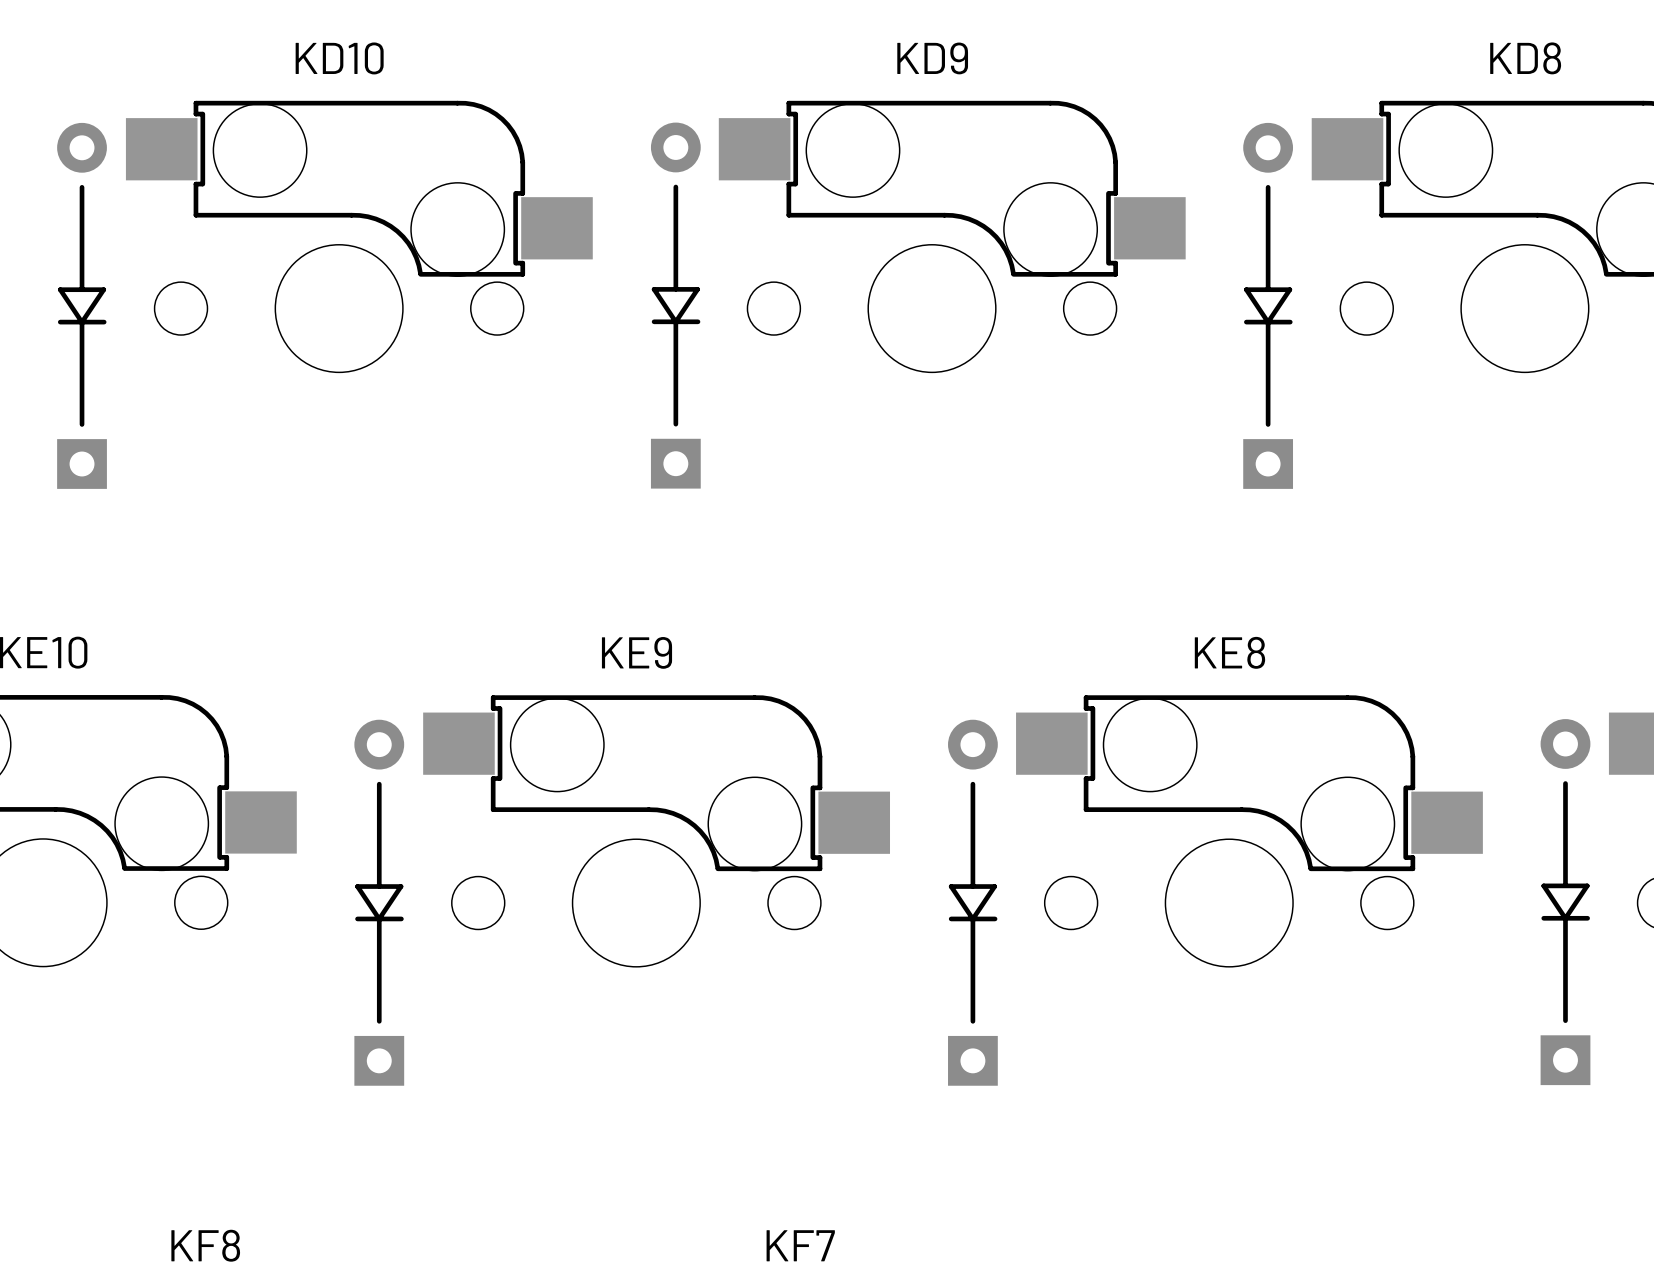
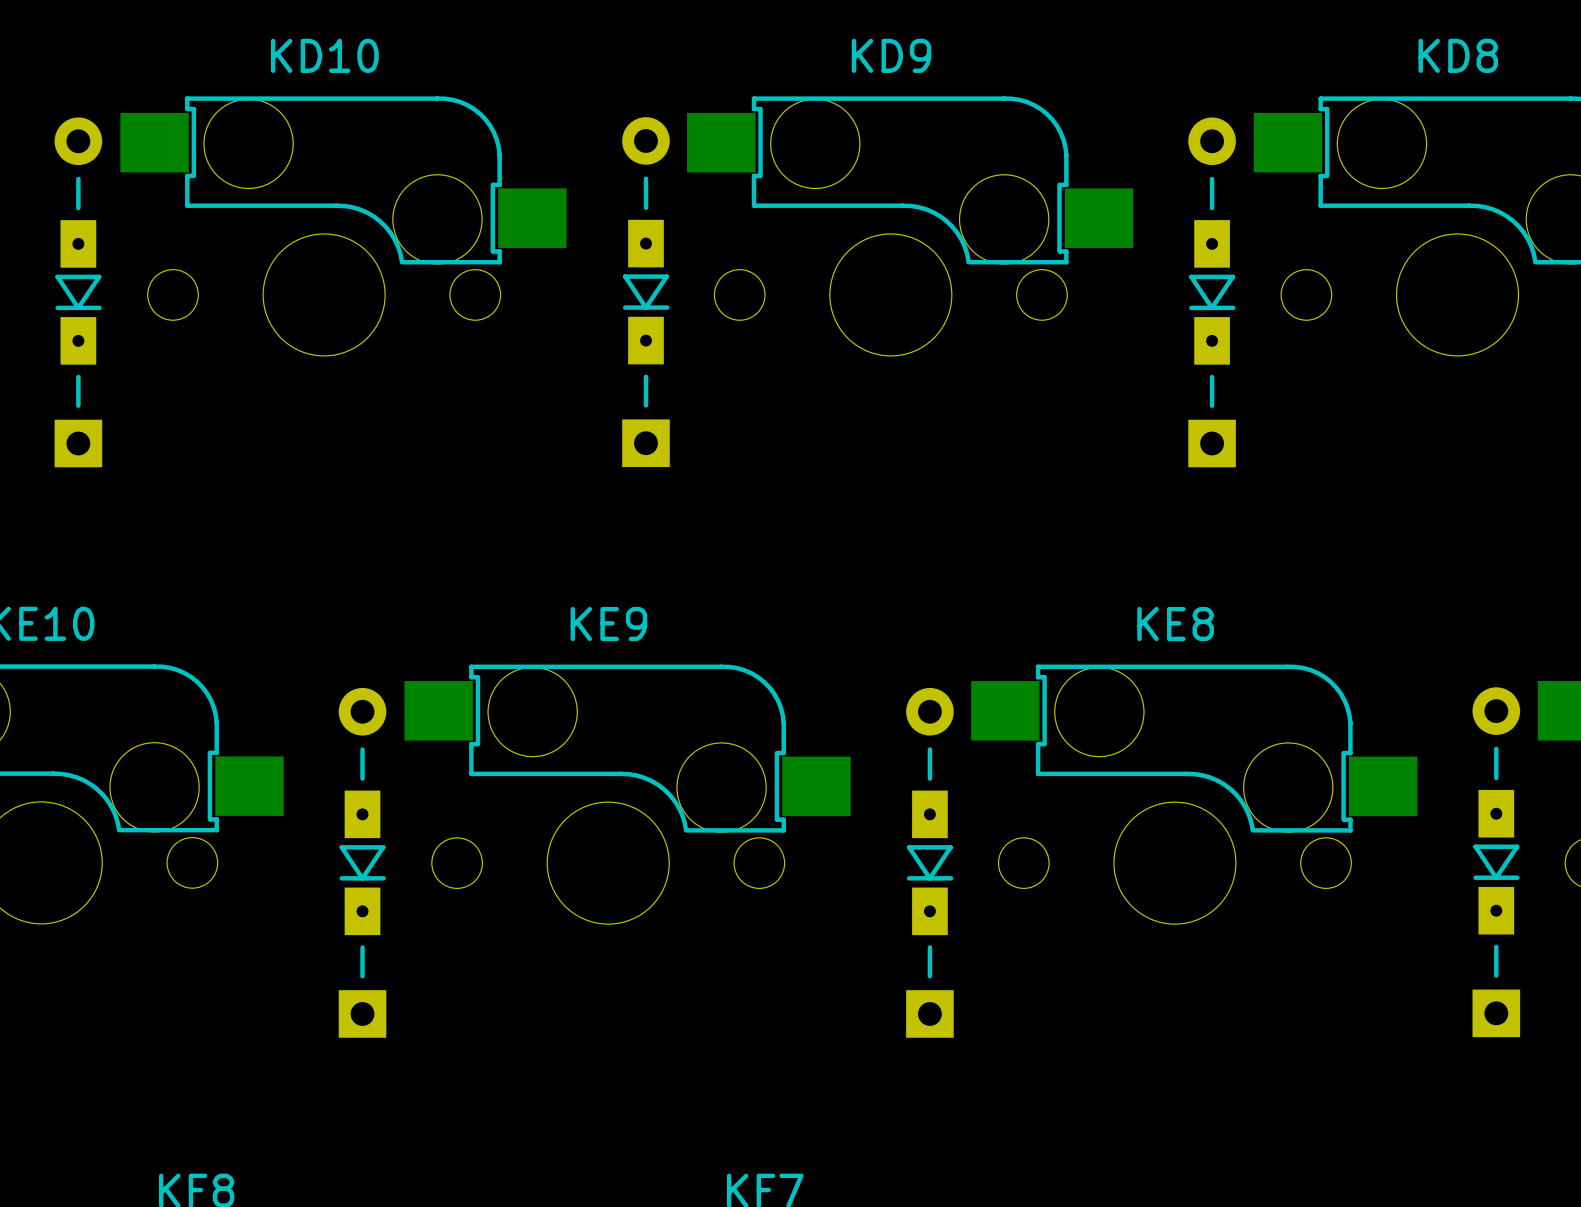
part footprint: [57, 122, 107, 489] -> [54, 117, 103, 468]
part footprint: [650, 122, 701, 489] -> [622, 117, 670, 468]
part footprint: [1243, 122, 1294, 489] -> [1188, 117, 1236, 468]
part footprint: [354, 719, 405, 1086] -> [338, 687, 387, 1038]
part footprint: [948, 719, 998, 1086] -> [906, 687, 954, 1038]
part footprint: [1540, 719, 1591, 1086] -> [1472, 687, 1521, 1038]

